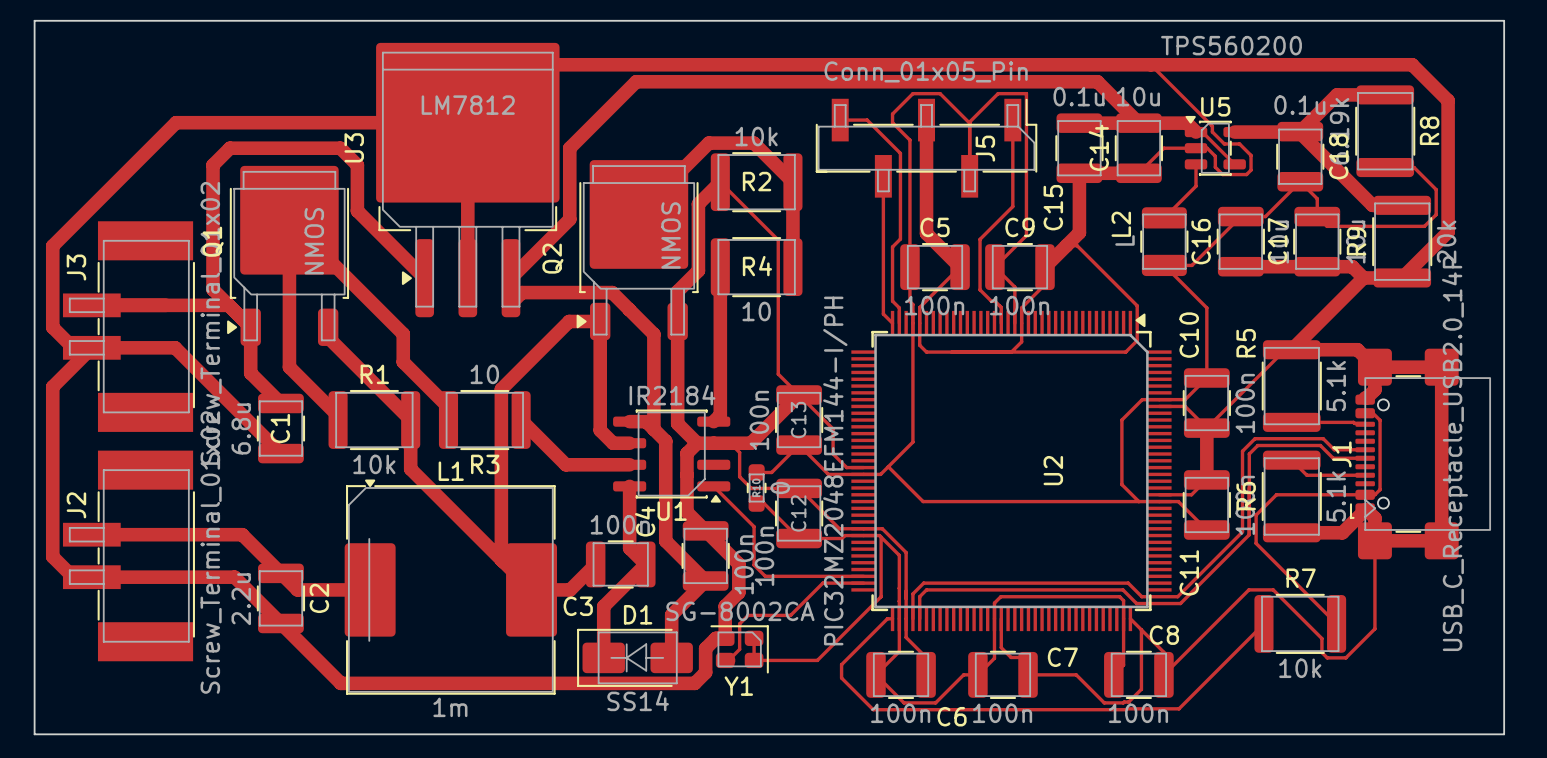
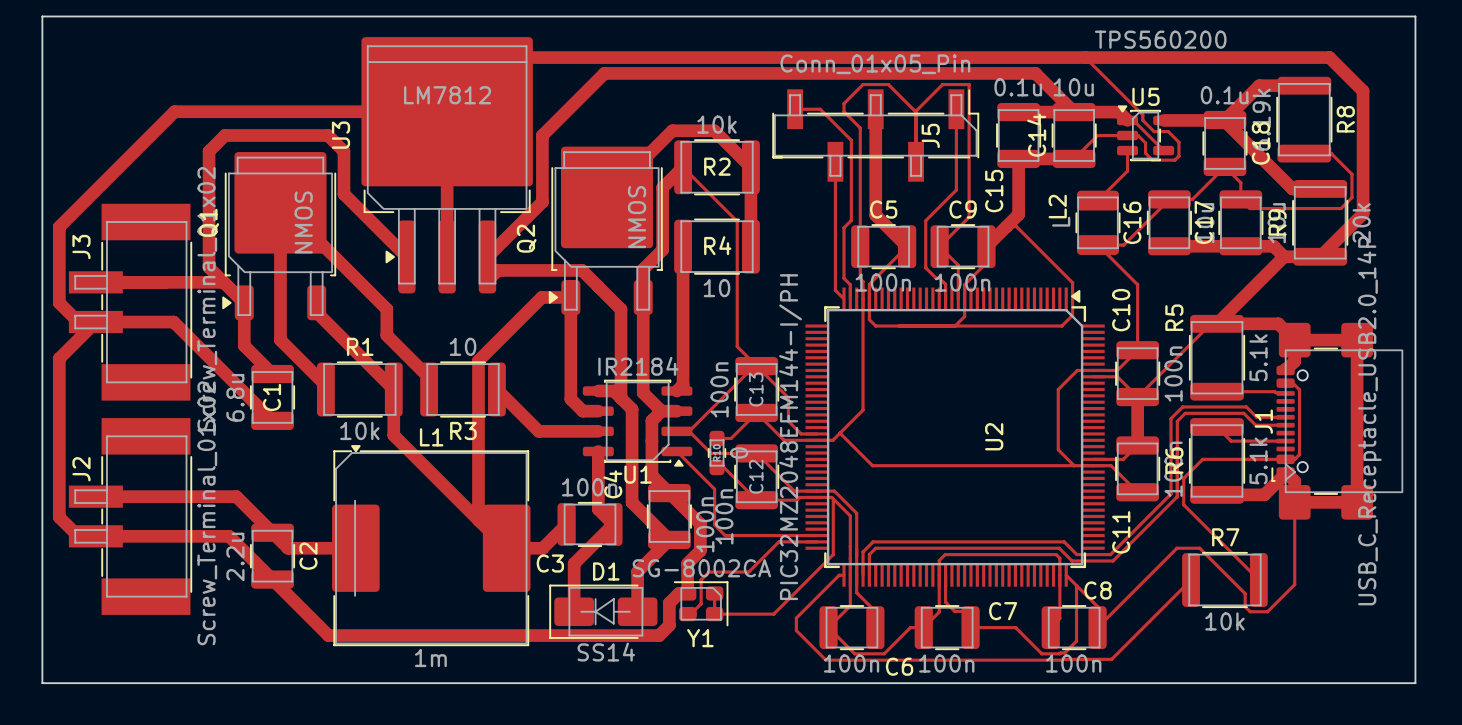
track: none -> (754, 366) (689, 431) (711, 453)
track: (799, 394) (750, 443) (713, 443) (730, 443) (739, 452) (739, 476) (751, 488) -> none

